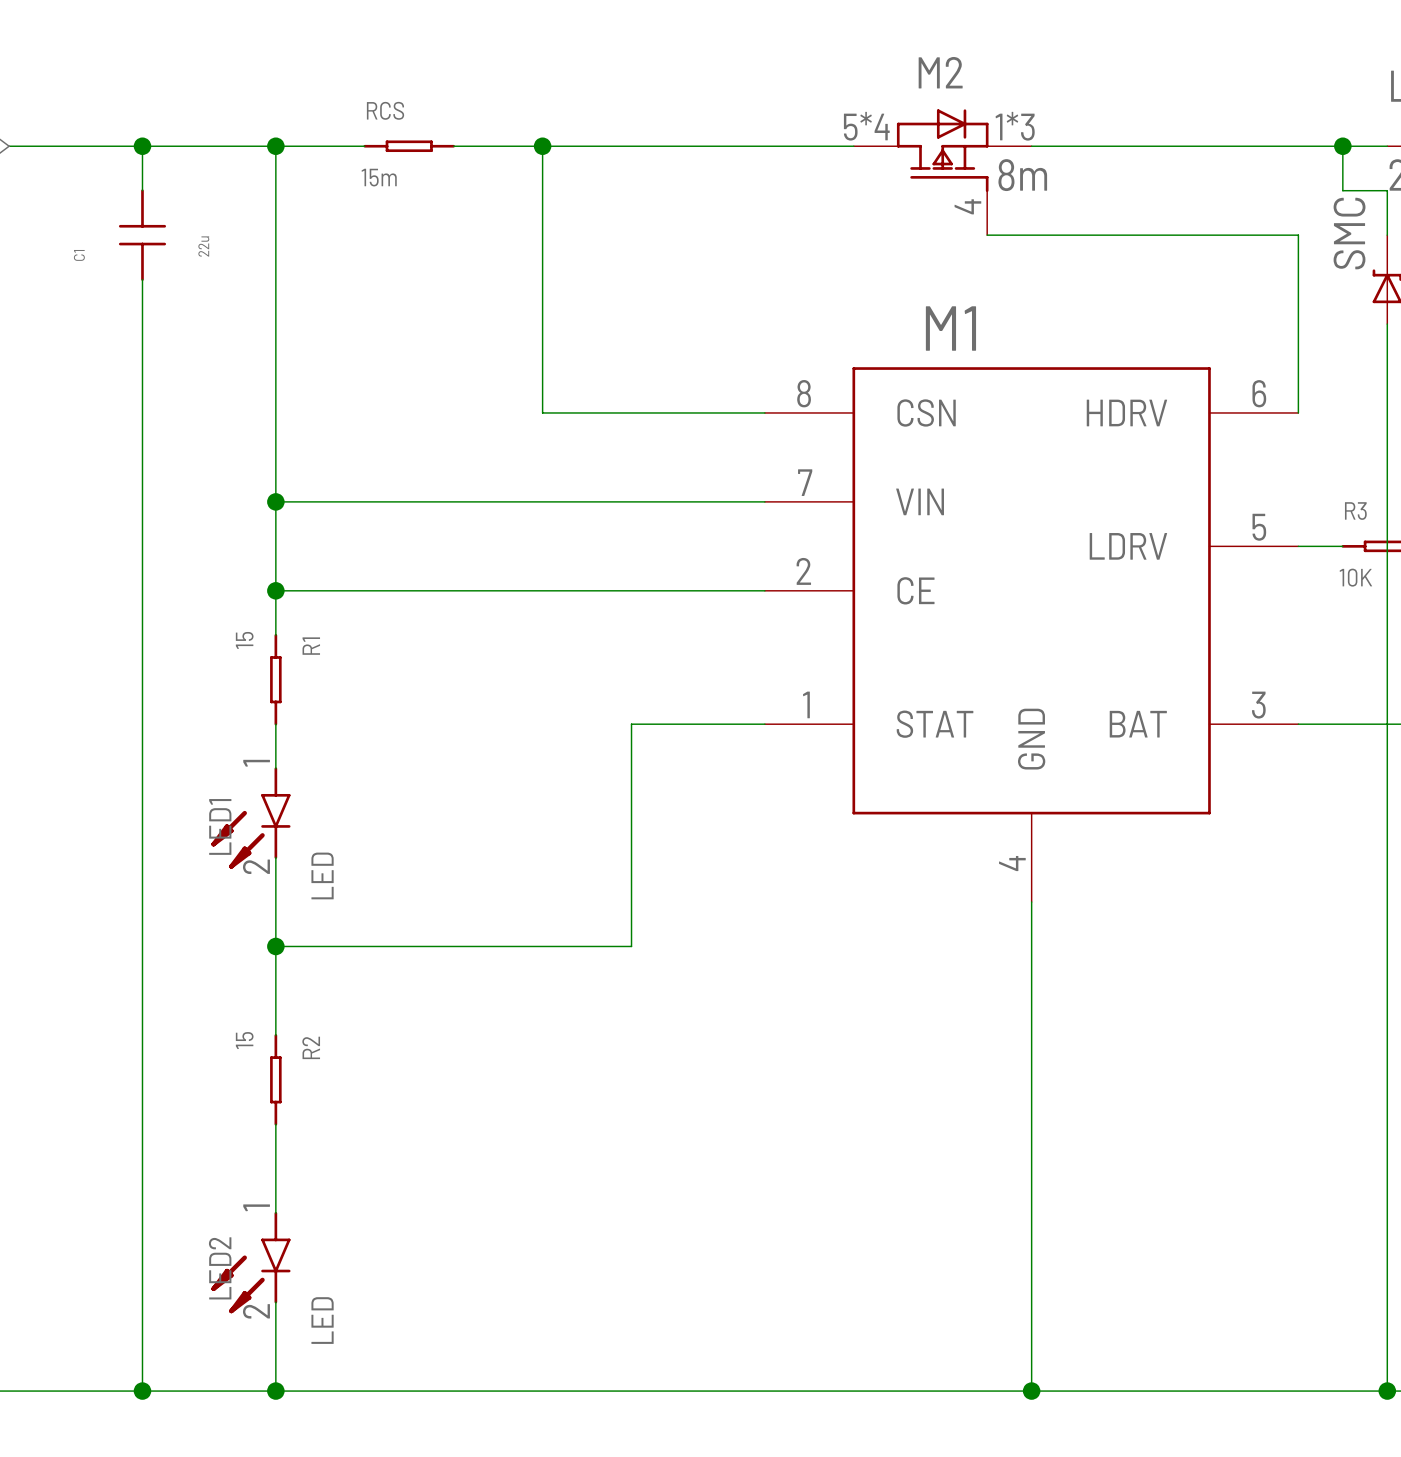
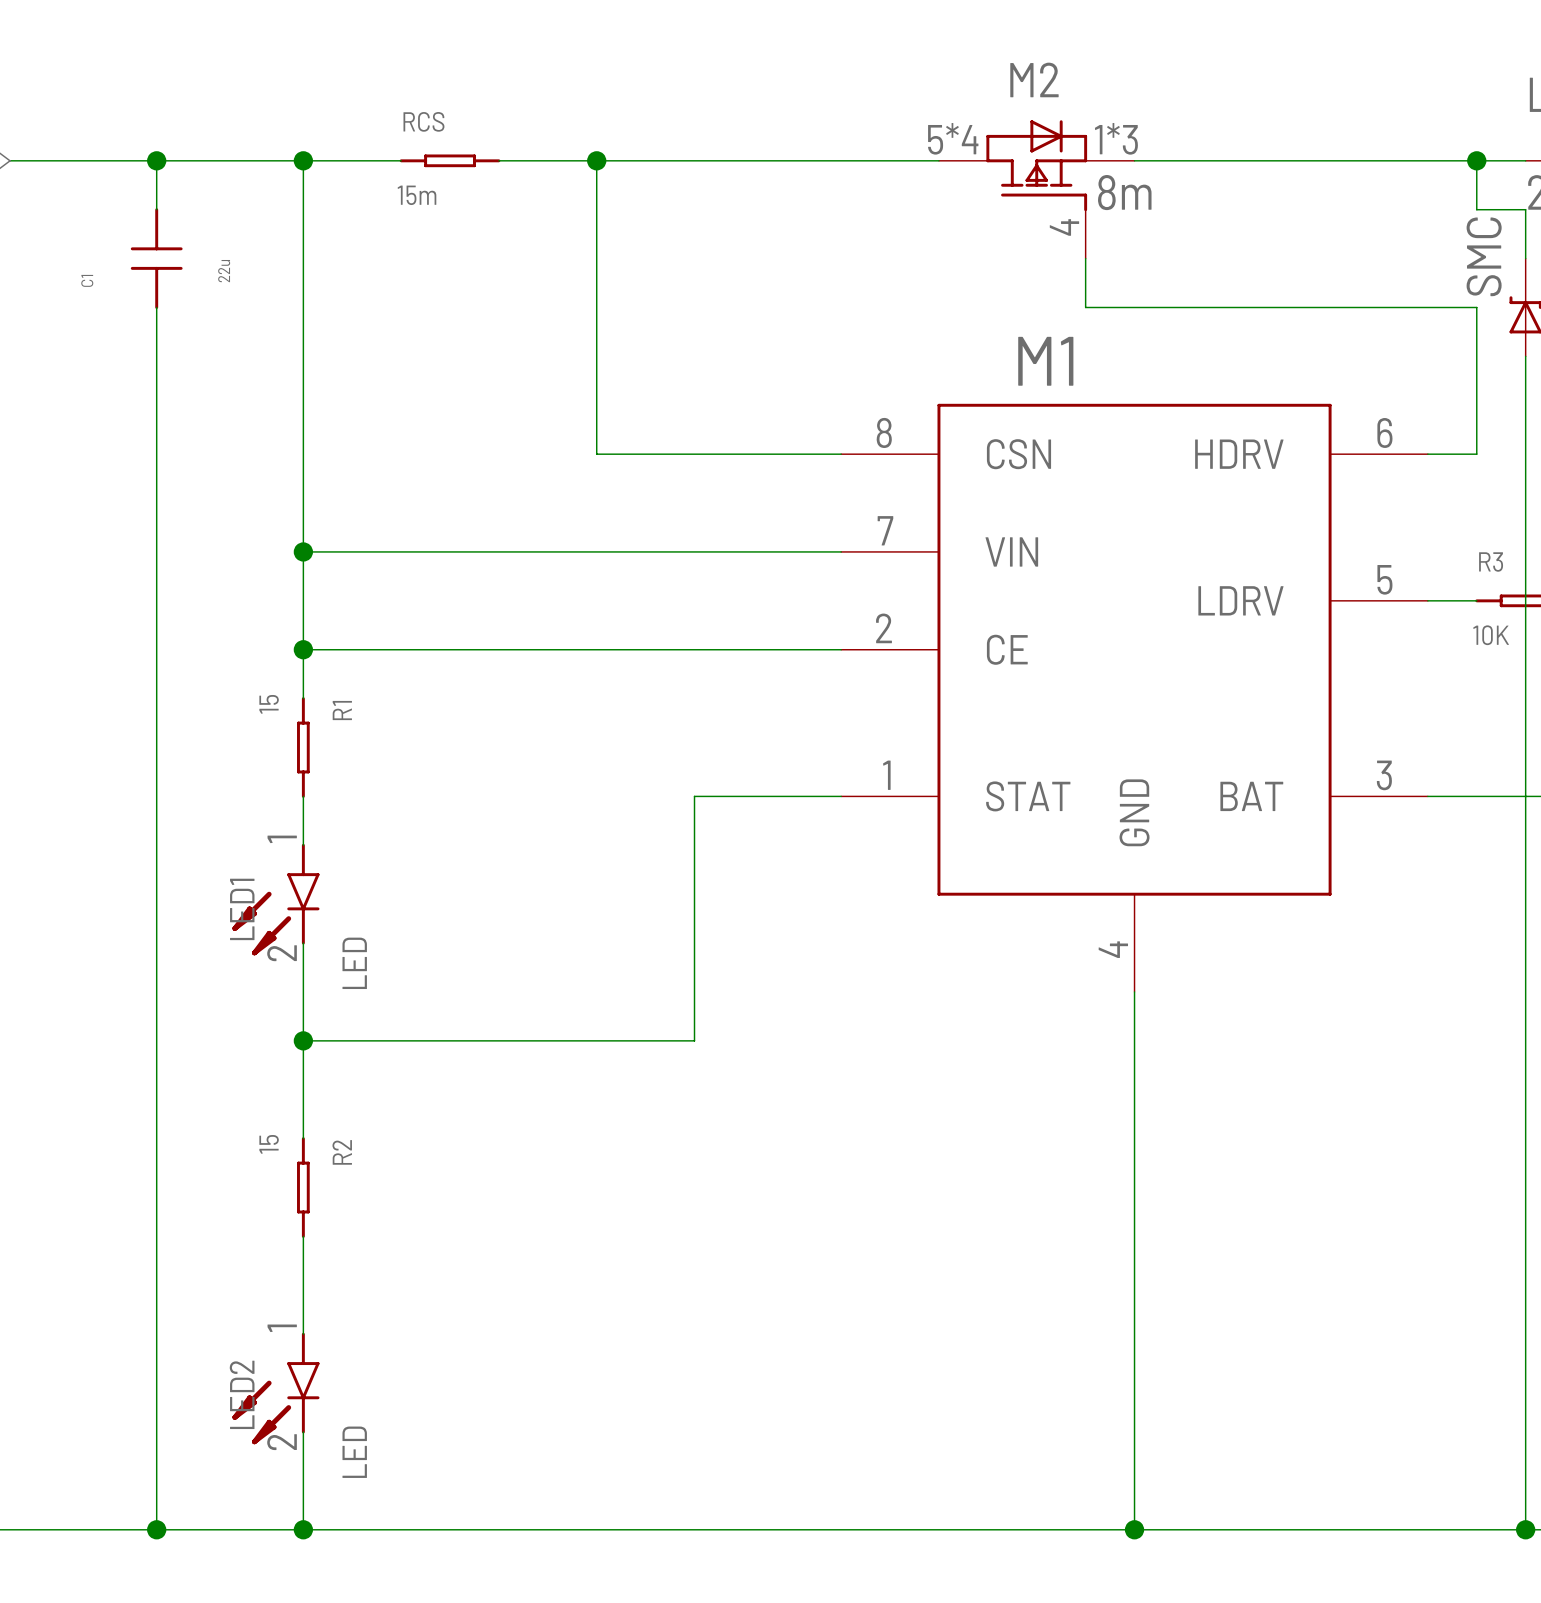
wire: (987, 235) (1298, 235) (1298, 412) -> (1085, 258) (1085, 307) (1476, 307) (1476, 454) (1427, 454)

